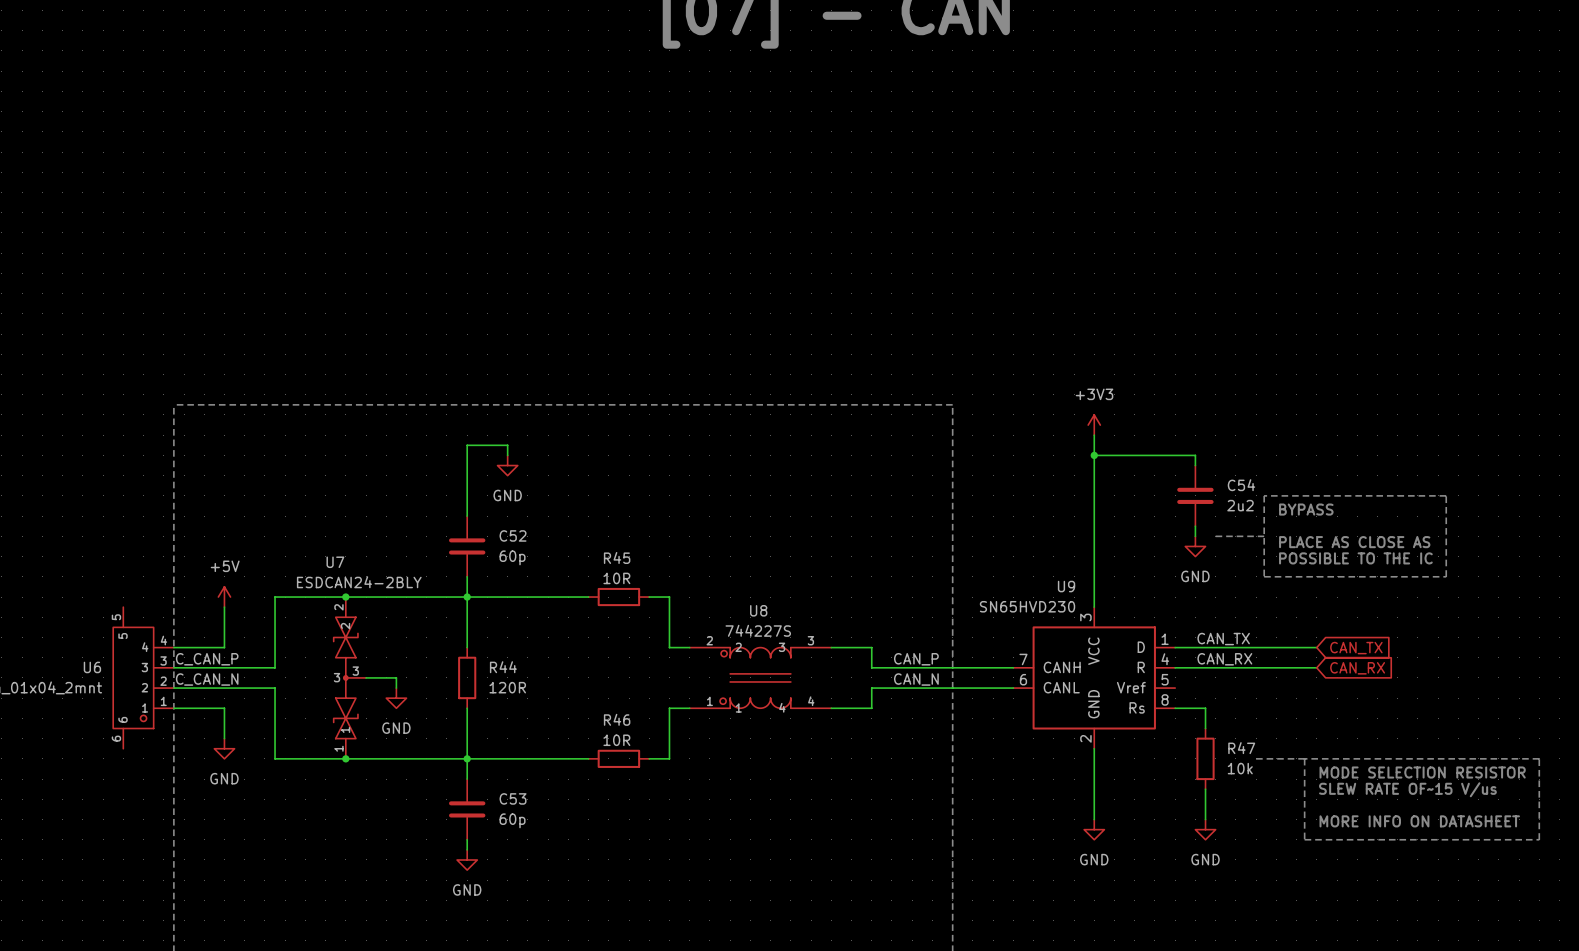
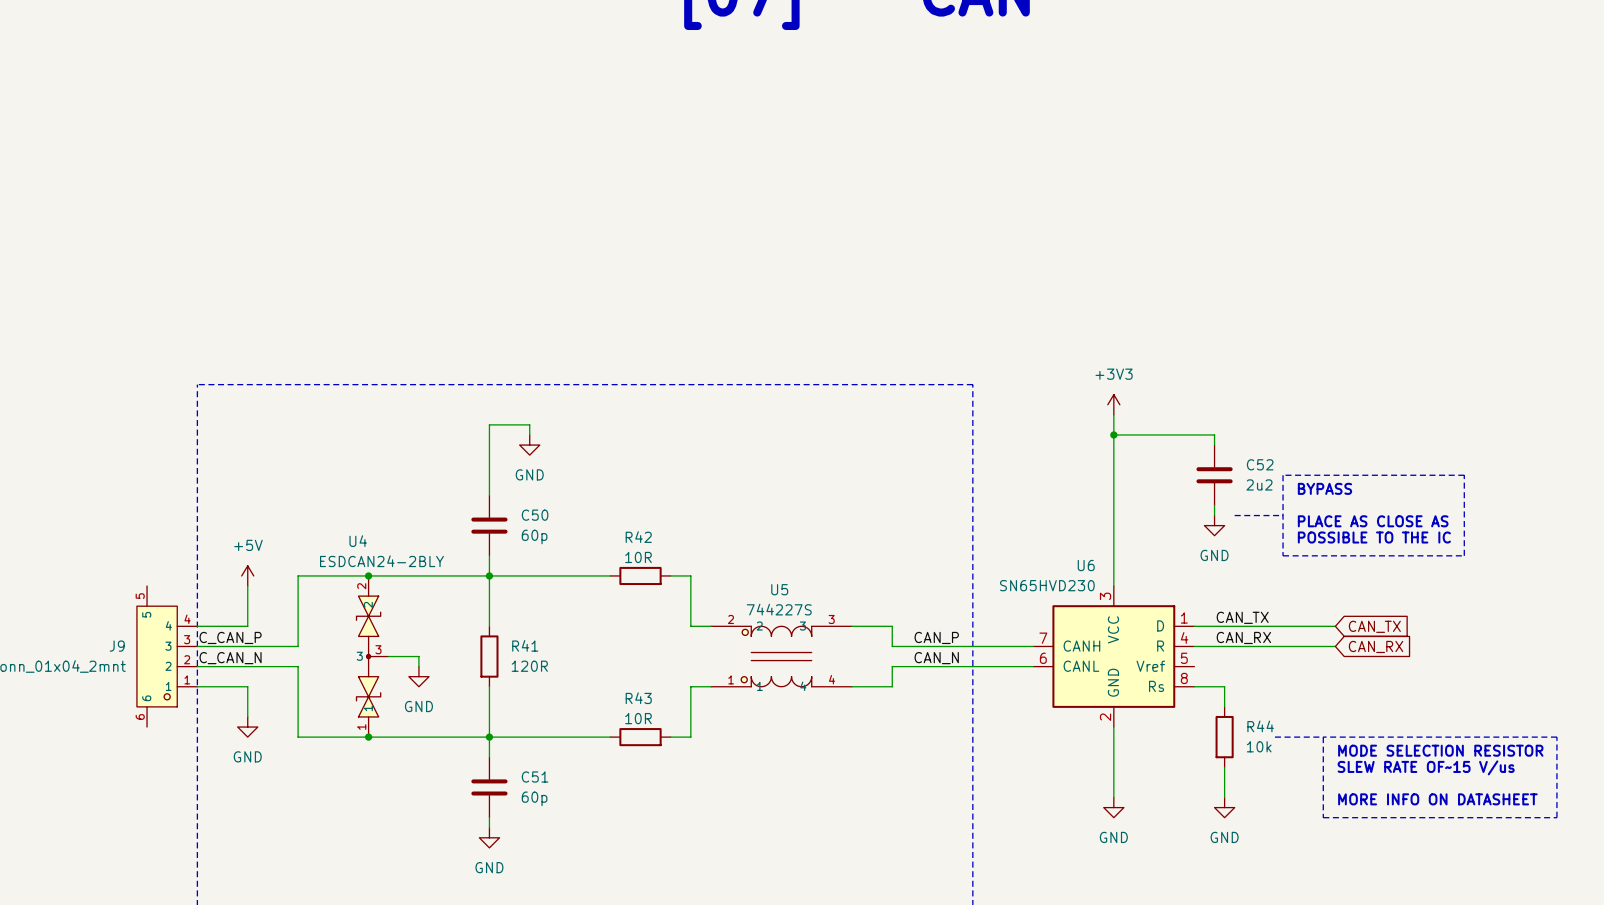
C54 name: C54 (1241, 485) -> C52 (1260, 464)
C52 name: C52 (513, 535) -> C50 (535, 515)
R45 name: R45 (617, 557) -> R42 (638, 537)
U7 name: U7 (335, 562) -> U4 (358, 541)
U9 name: U9 (1066, 586) -> U6 (1086, 565)
U8 name: U8 (758, 610) -> U5 (779, 589)
U6 name: U6 (92, 667) -> J9 (117, 646)
R44 name: R44 (503, 667) -> R41 (525, 645)
R46 name: R46 (617, 719) -> R43 (638, 698)
R47 name: R47 (1241, 748) -> R44 (1260, 726)
C53 name: C53 (513, 798) -> C51 (535, 777)

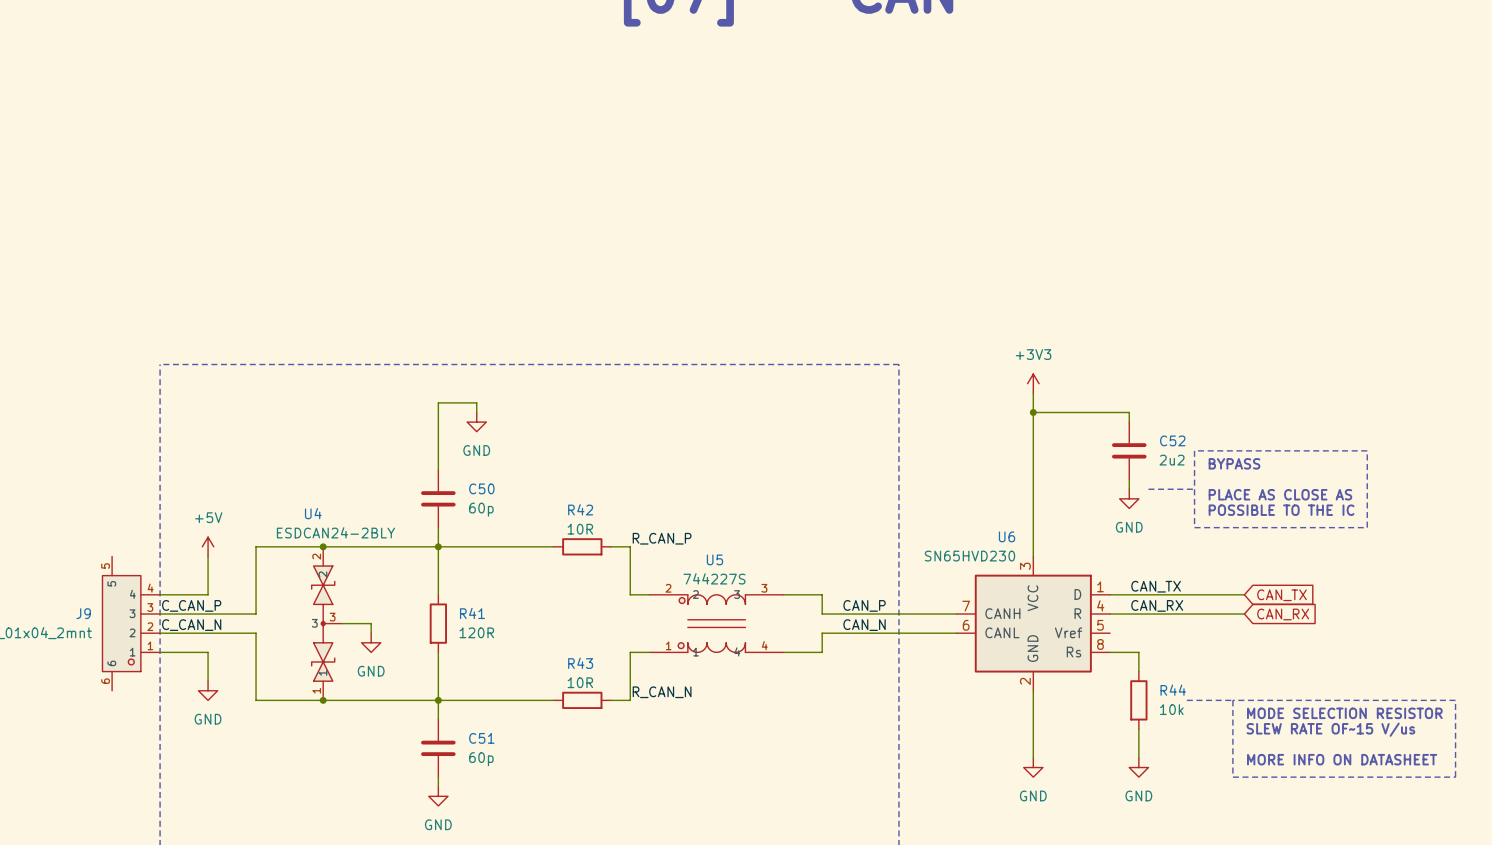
label: none -> R_CAN_P (662, 538)
label: none -> R_CAN_N (662, 692)

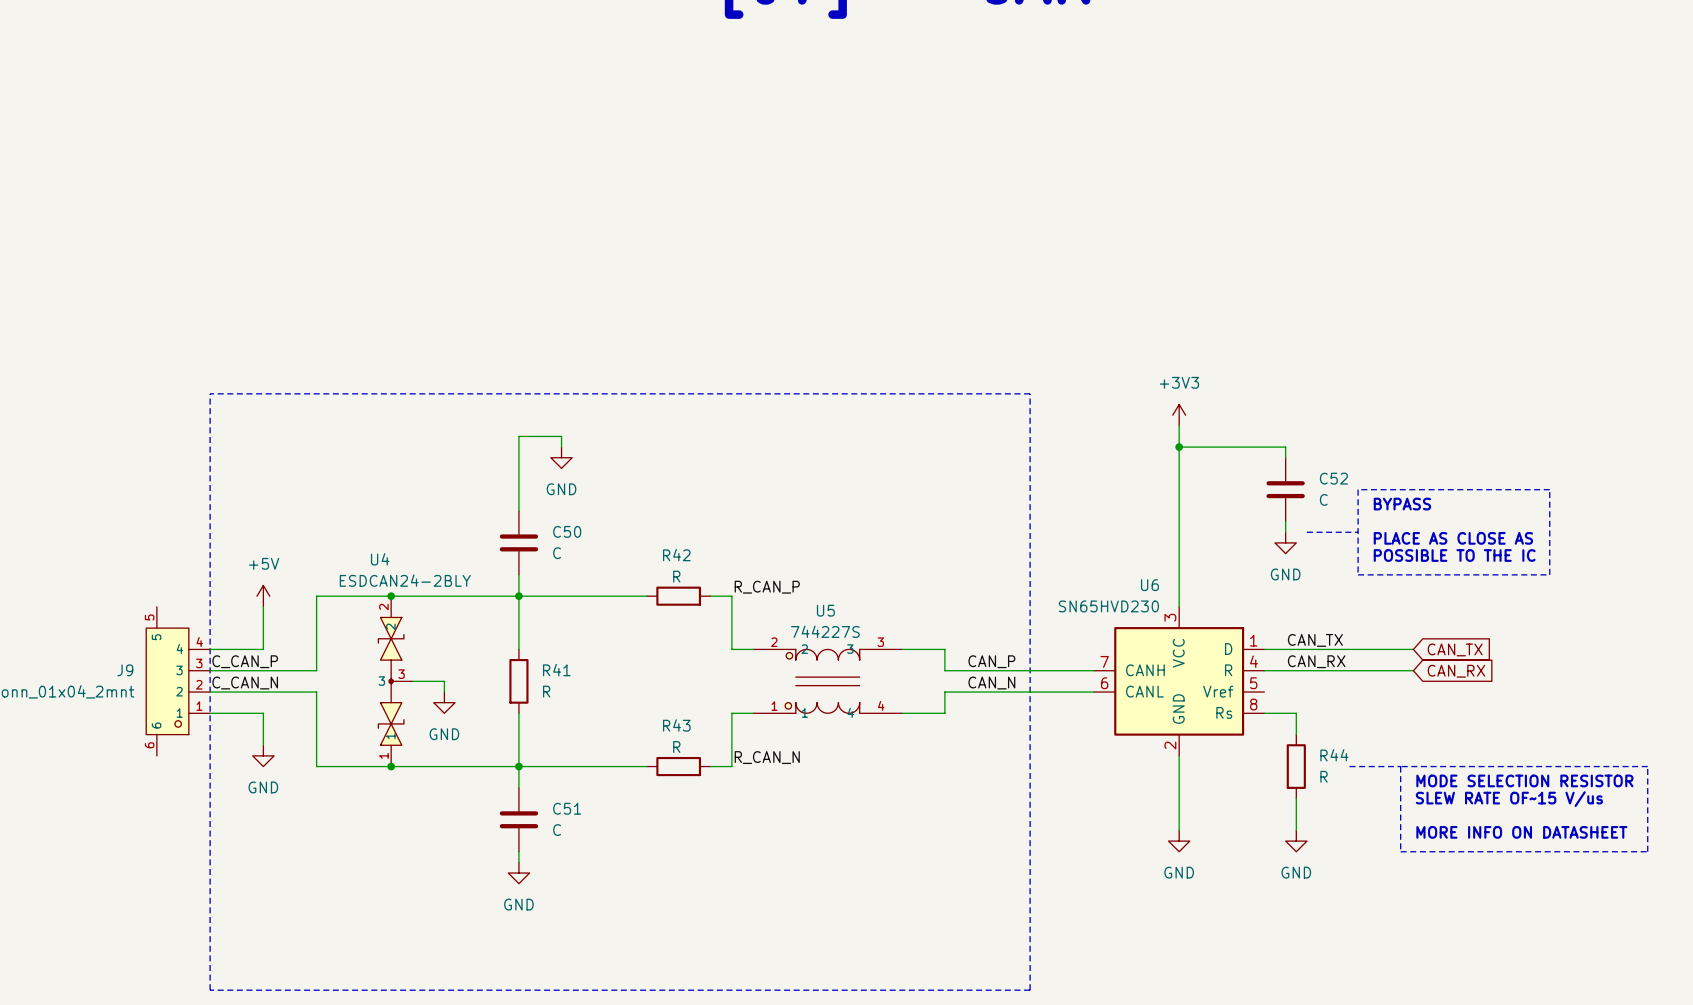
C52 value: 2u2 (1172, 460) -> C (1323, 499)
C50 value: 60p (481, 509) -> C (557, 553)
R42 value: 10R (580, 529) -> R (676, 576)
R41 value: 120R (476, 632) -> R (546, 691)
R43 value: 10R (580, 682) -> R (676, 746)
R44 value: 10k (1171, 709) -> R (1324, 776)
C51 value: 60p (481, 759) -> C (557, 830)

